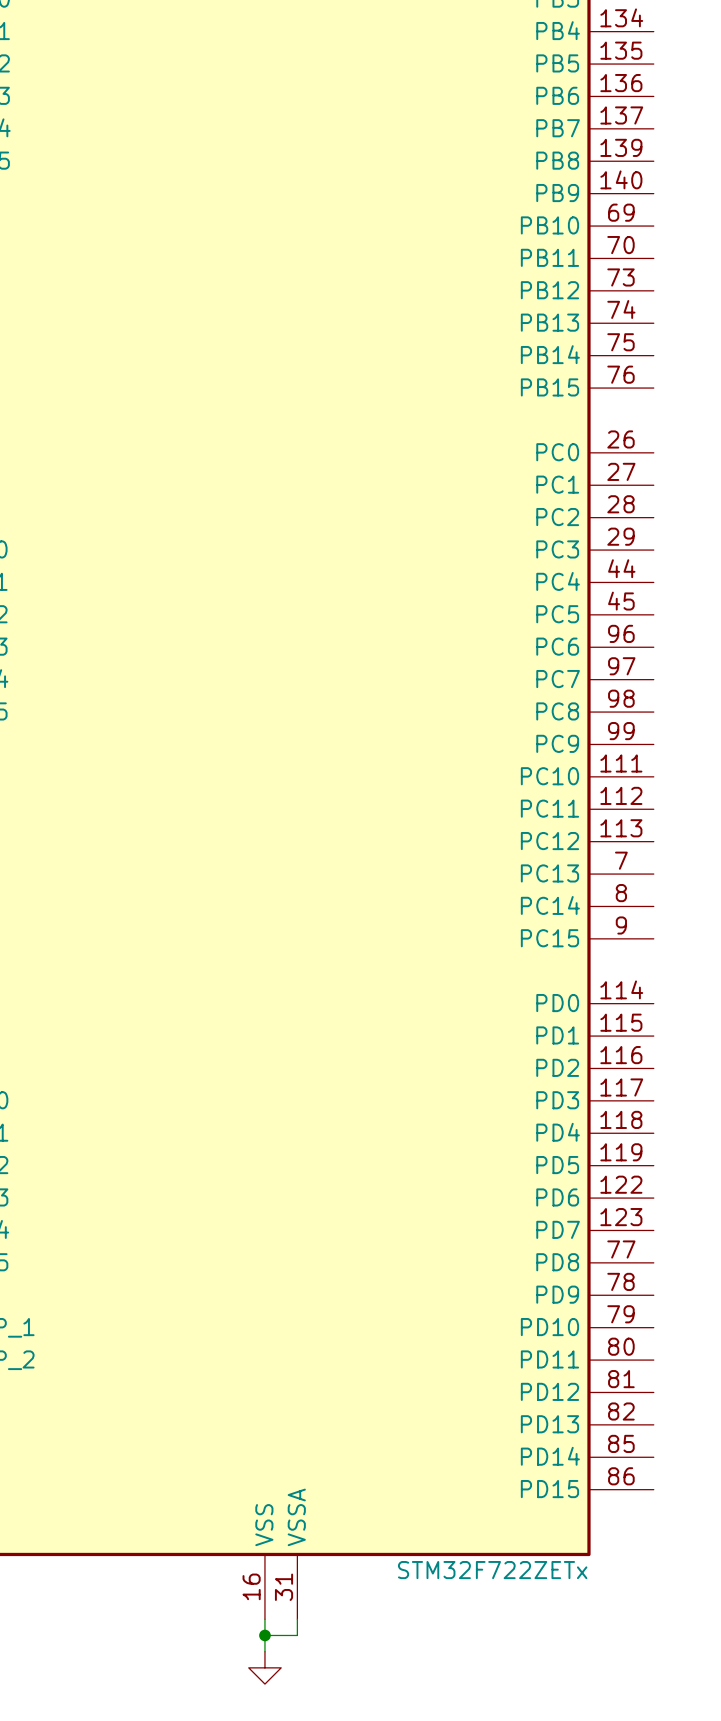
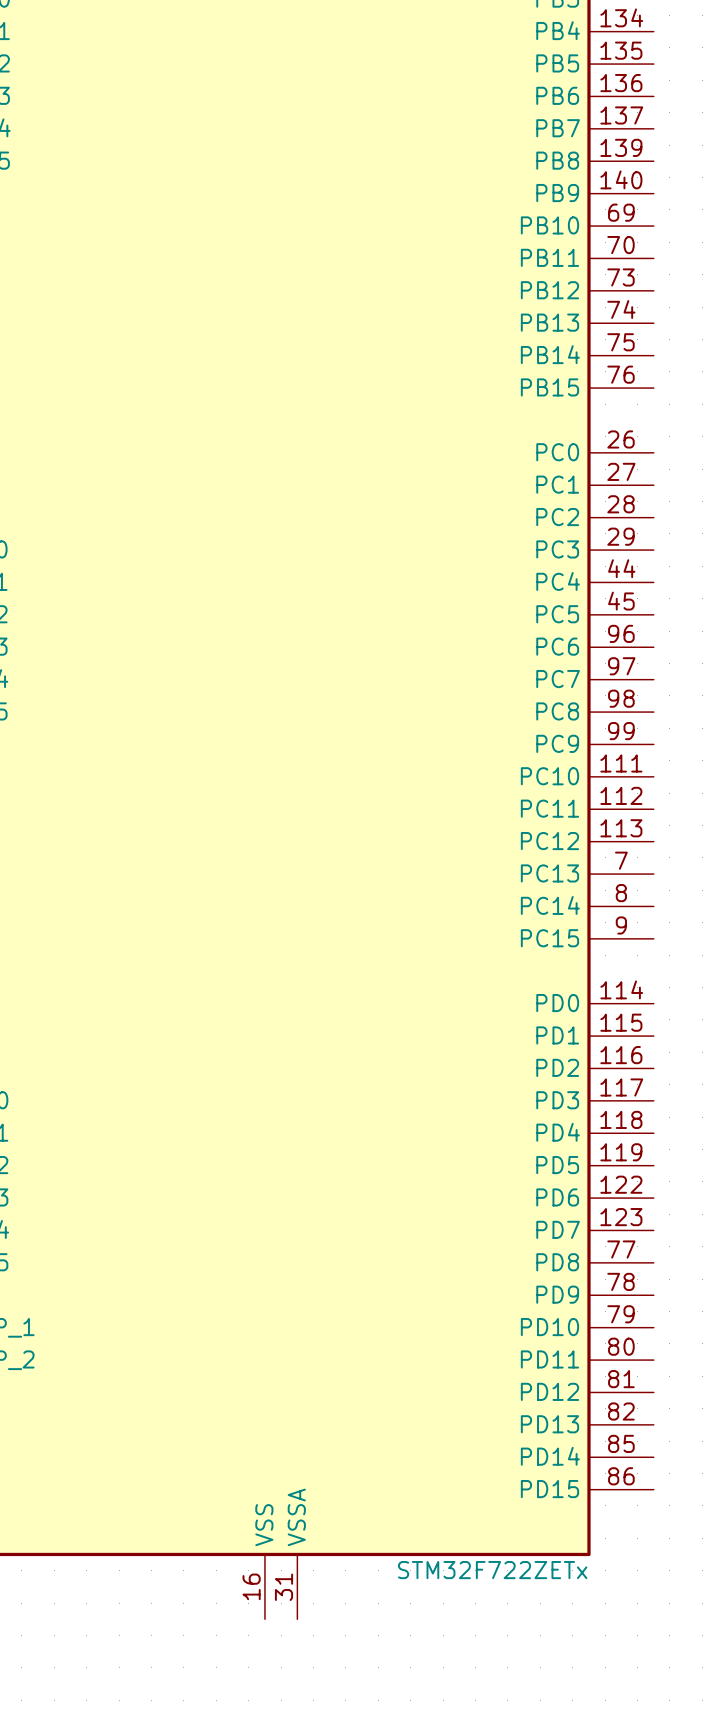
wire: (264, 1619) (264, 1651) -> none
wire: (297, 1619) (297, 1635) (264, 1635) -> none
junction: (264, 1635) -> none
power symbol: (264, 1667) -> none

